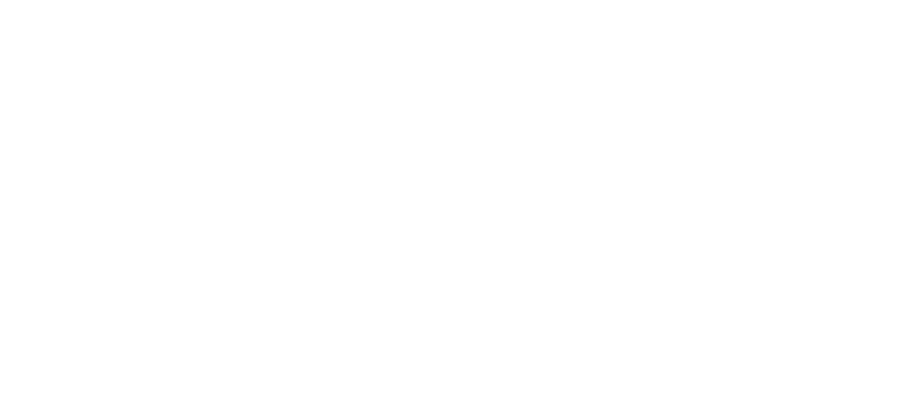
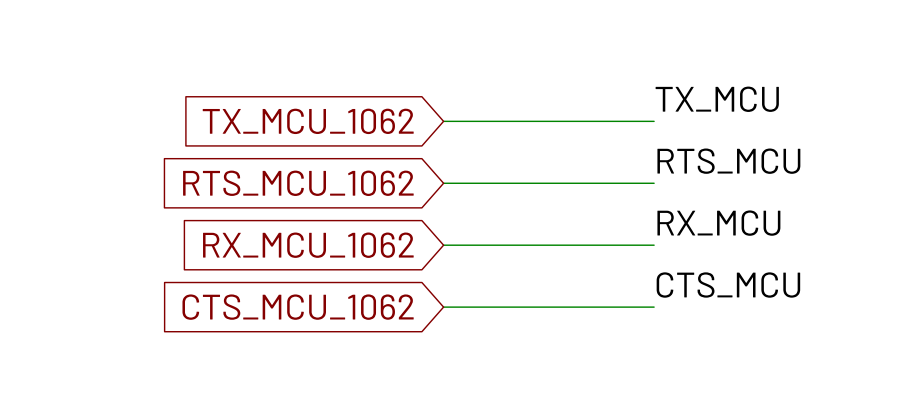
label: none -> TX_MCU (717, 99)
global label: none -> TX_MCU_1062 (308, 121)
wire: none -> (443, 121) (654, 121)
label: none -> RTS_MCU (728, 161)
global label: none -> RTS_MCU_1062 (298, 183)
wire: none -> (443, 183) (654, 183)
label: none -> RX_MCU (718, 223)
global label: none -> RX_MCU_1062 (308, 245)
wire: none -> (443, 245) (654, 245)
label: none -> CTS_MCU (728, 285)
global label: none -> CTS_MCU_1062 (298, 307)
wire: none -> (443, 307) (654, 307)

